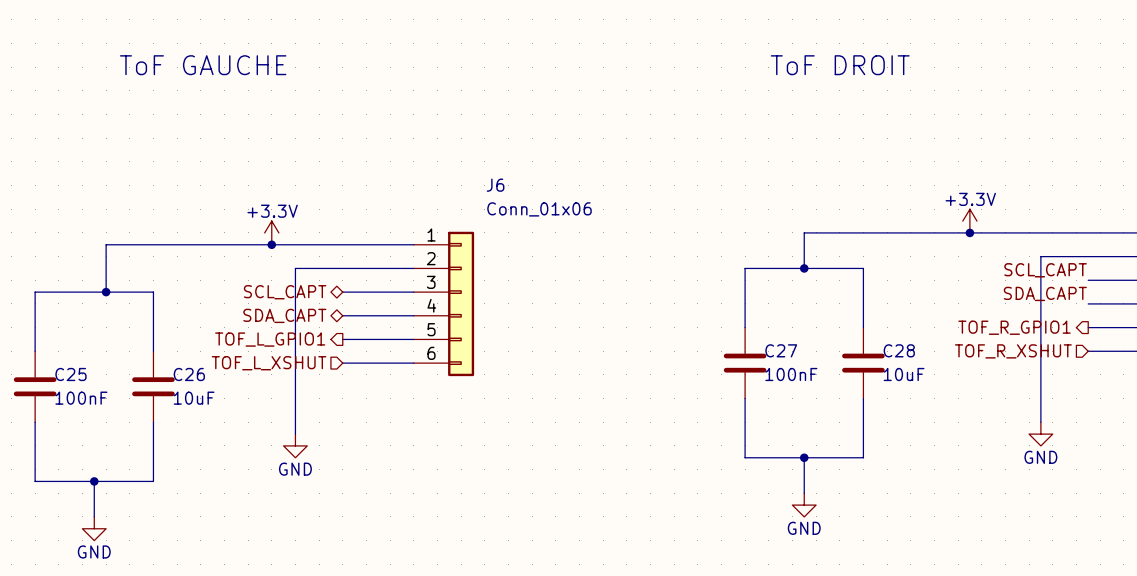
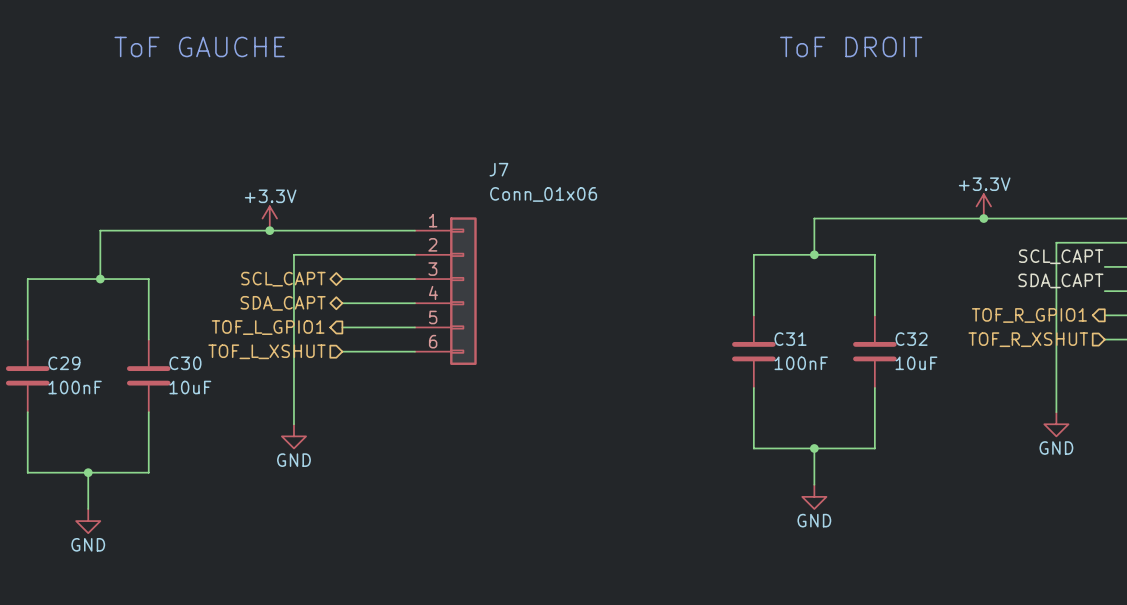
J6 name: J6 (495, 185) -> J7 (498, 169)
C27 name: C27 (781, 350) -> C31 (790, 339)
C28 name: C28 (899, 350) -> C32 (911, 339)
C25 name: C25 (70, 374) -> C29 (64, 363)
C26 name: C26 (189, 374) -> C30 (185, 363)

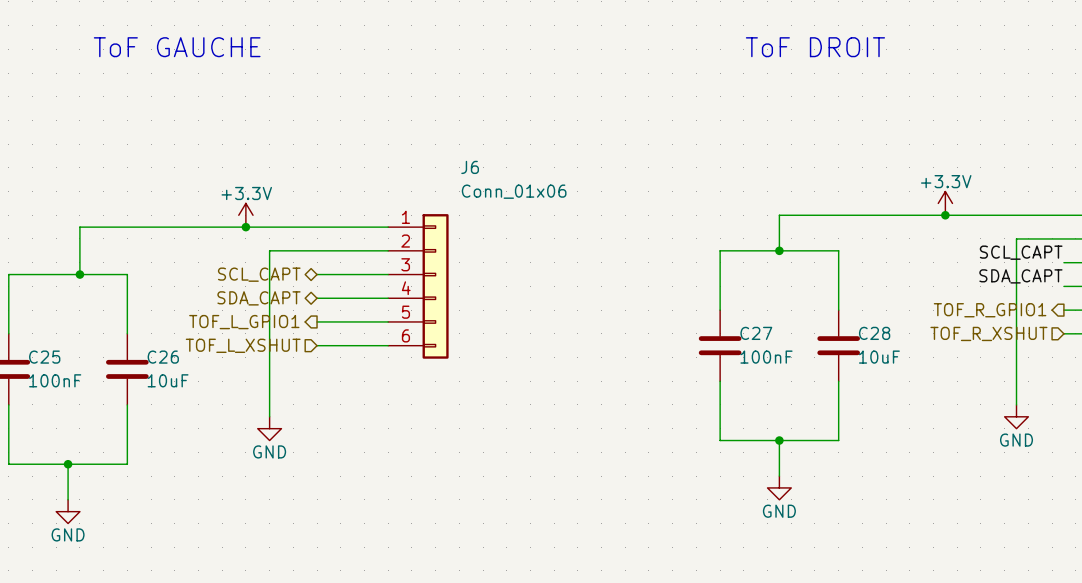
J7 name: J7 (498, 169) -> J6 (470, 167)
C31 name: C31 (790, 339) -> C27 (756, 333)
C32 name: C32 (911, 339) -> C28 (874, 333)
C29 name: C29 (64, 363) -> C25 (44, 357)
C30 name: C30 (185, 363) -> C26 (163, 357)

